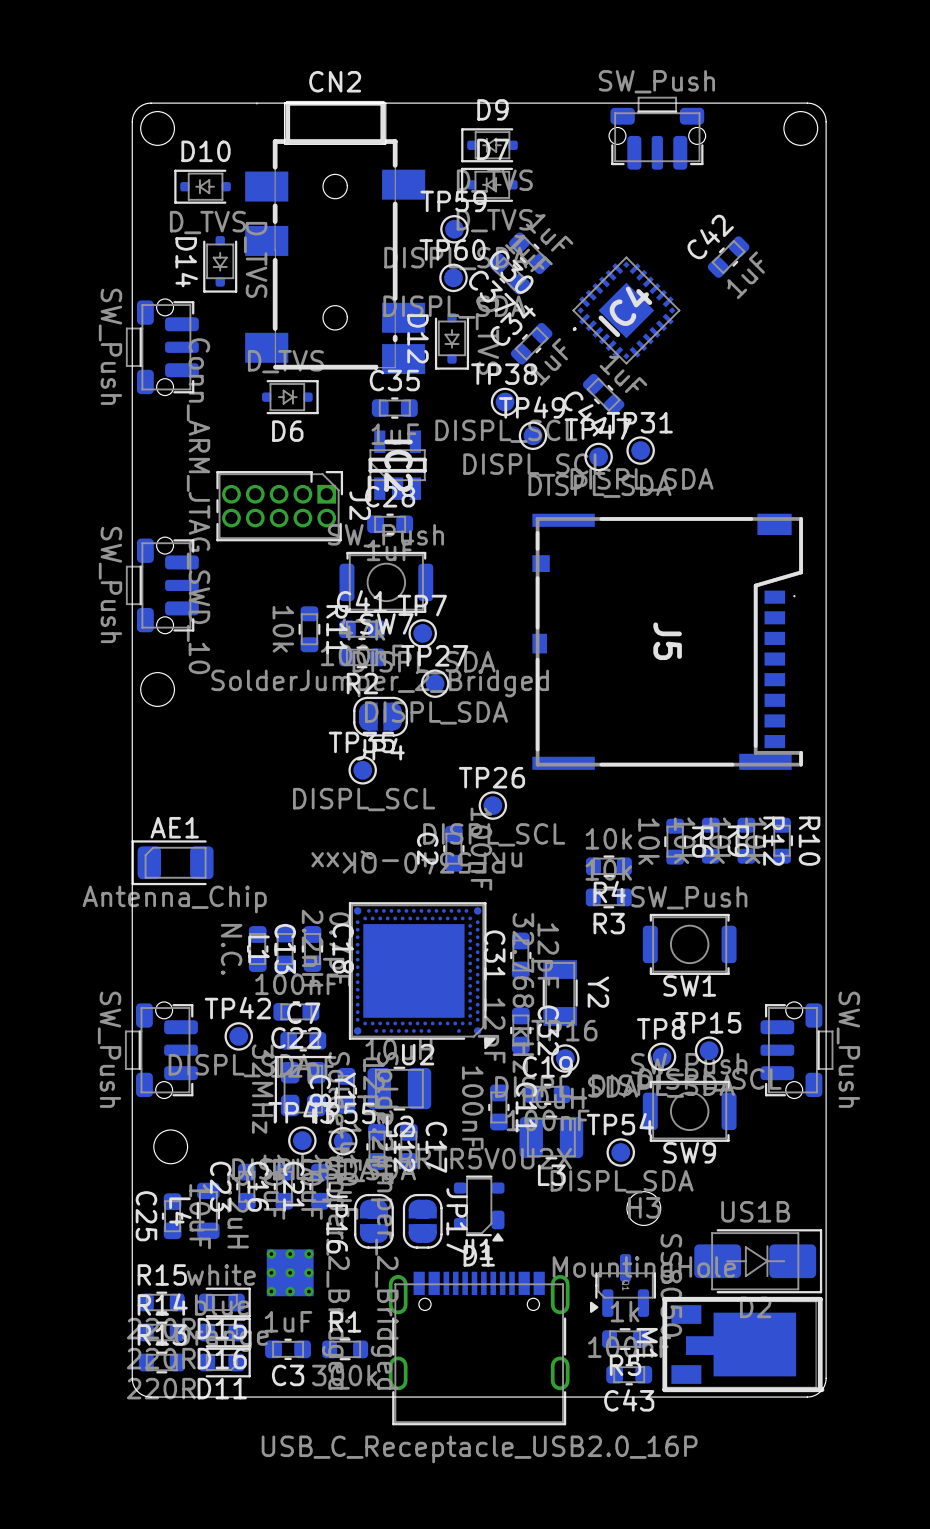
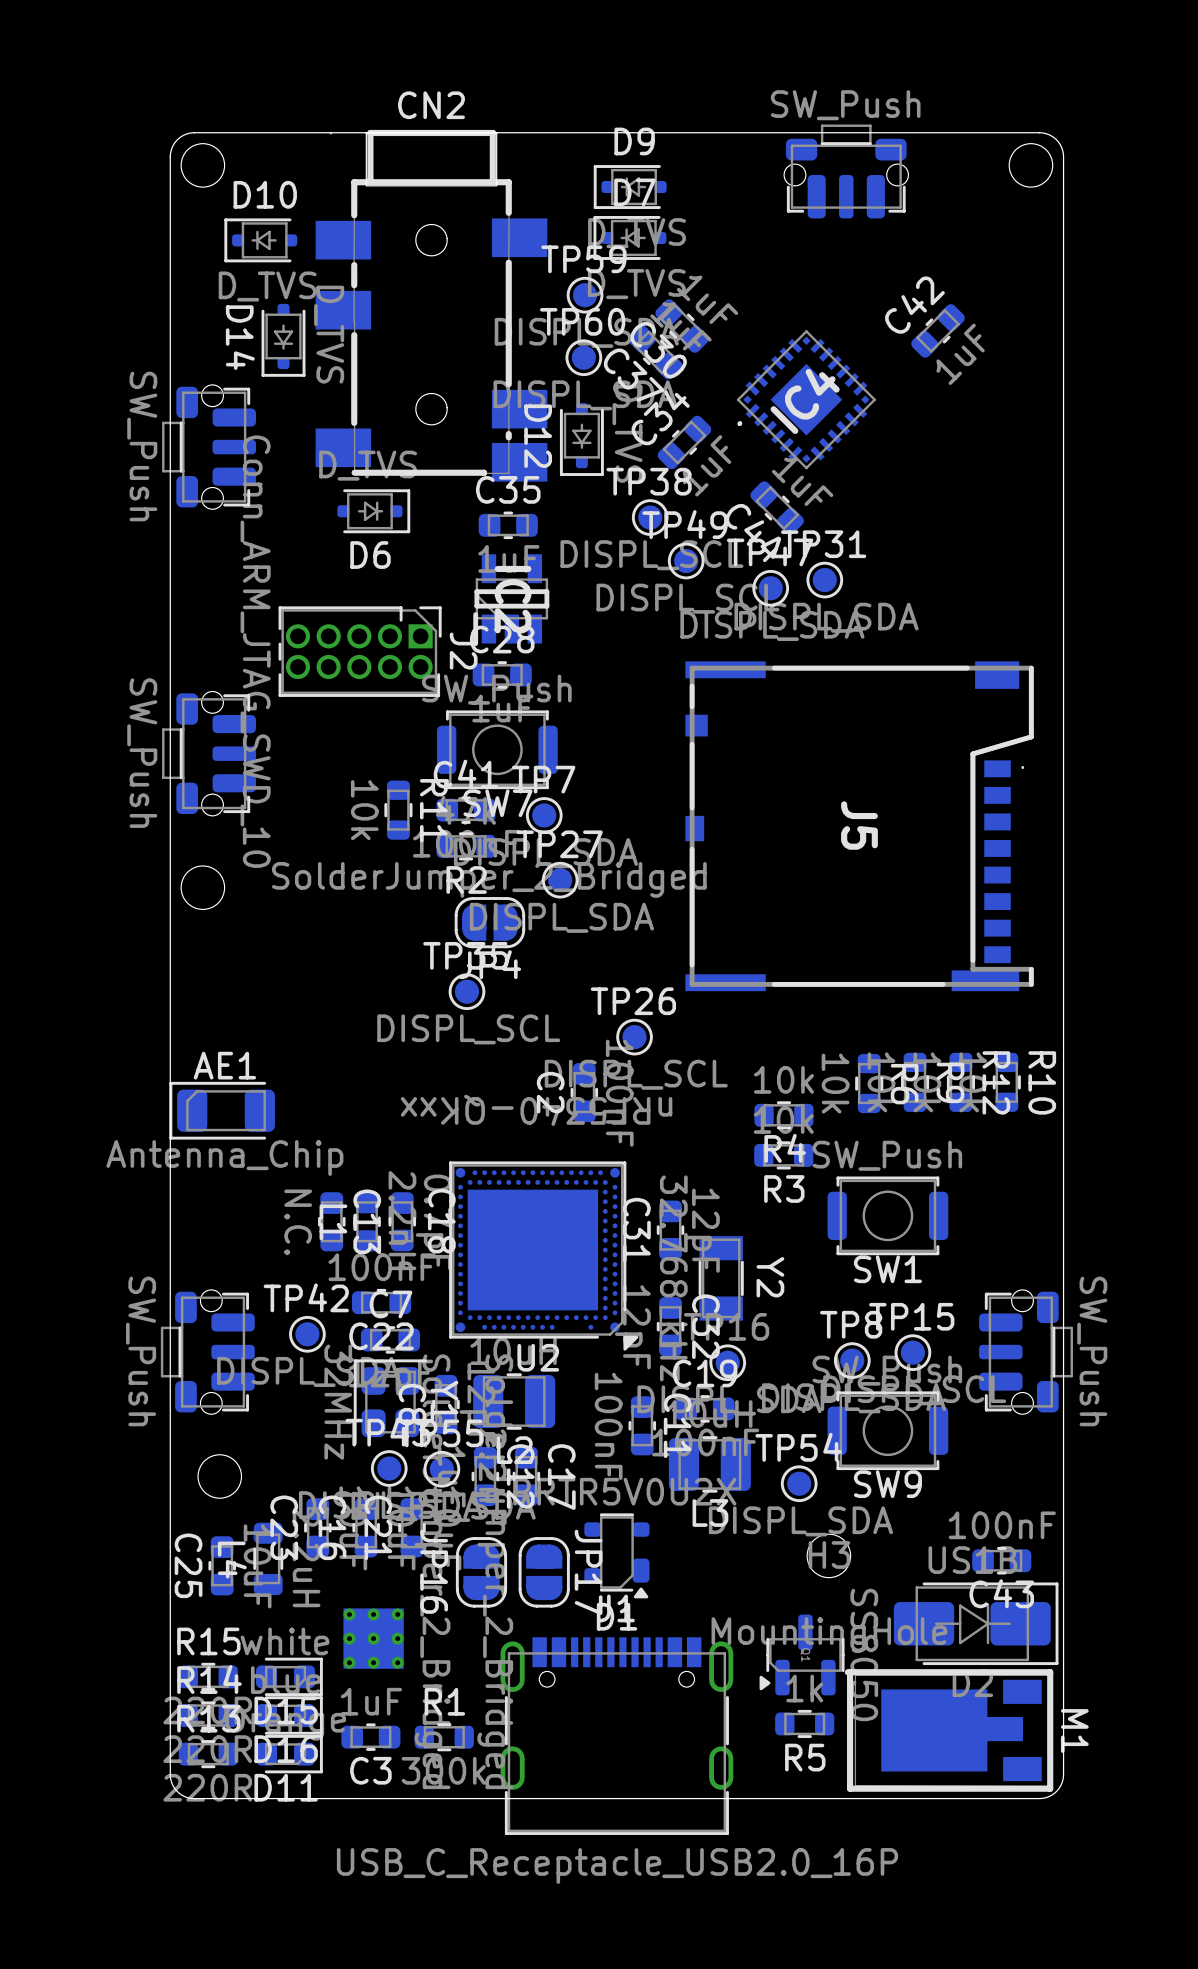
M1 rotation: 0° (743, 1344) -> 180° (949, 1730)
C43 position: (629, 1374) -> (1001, 1560)

